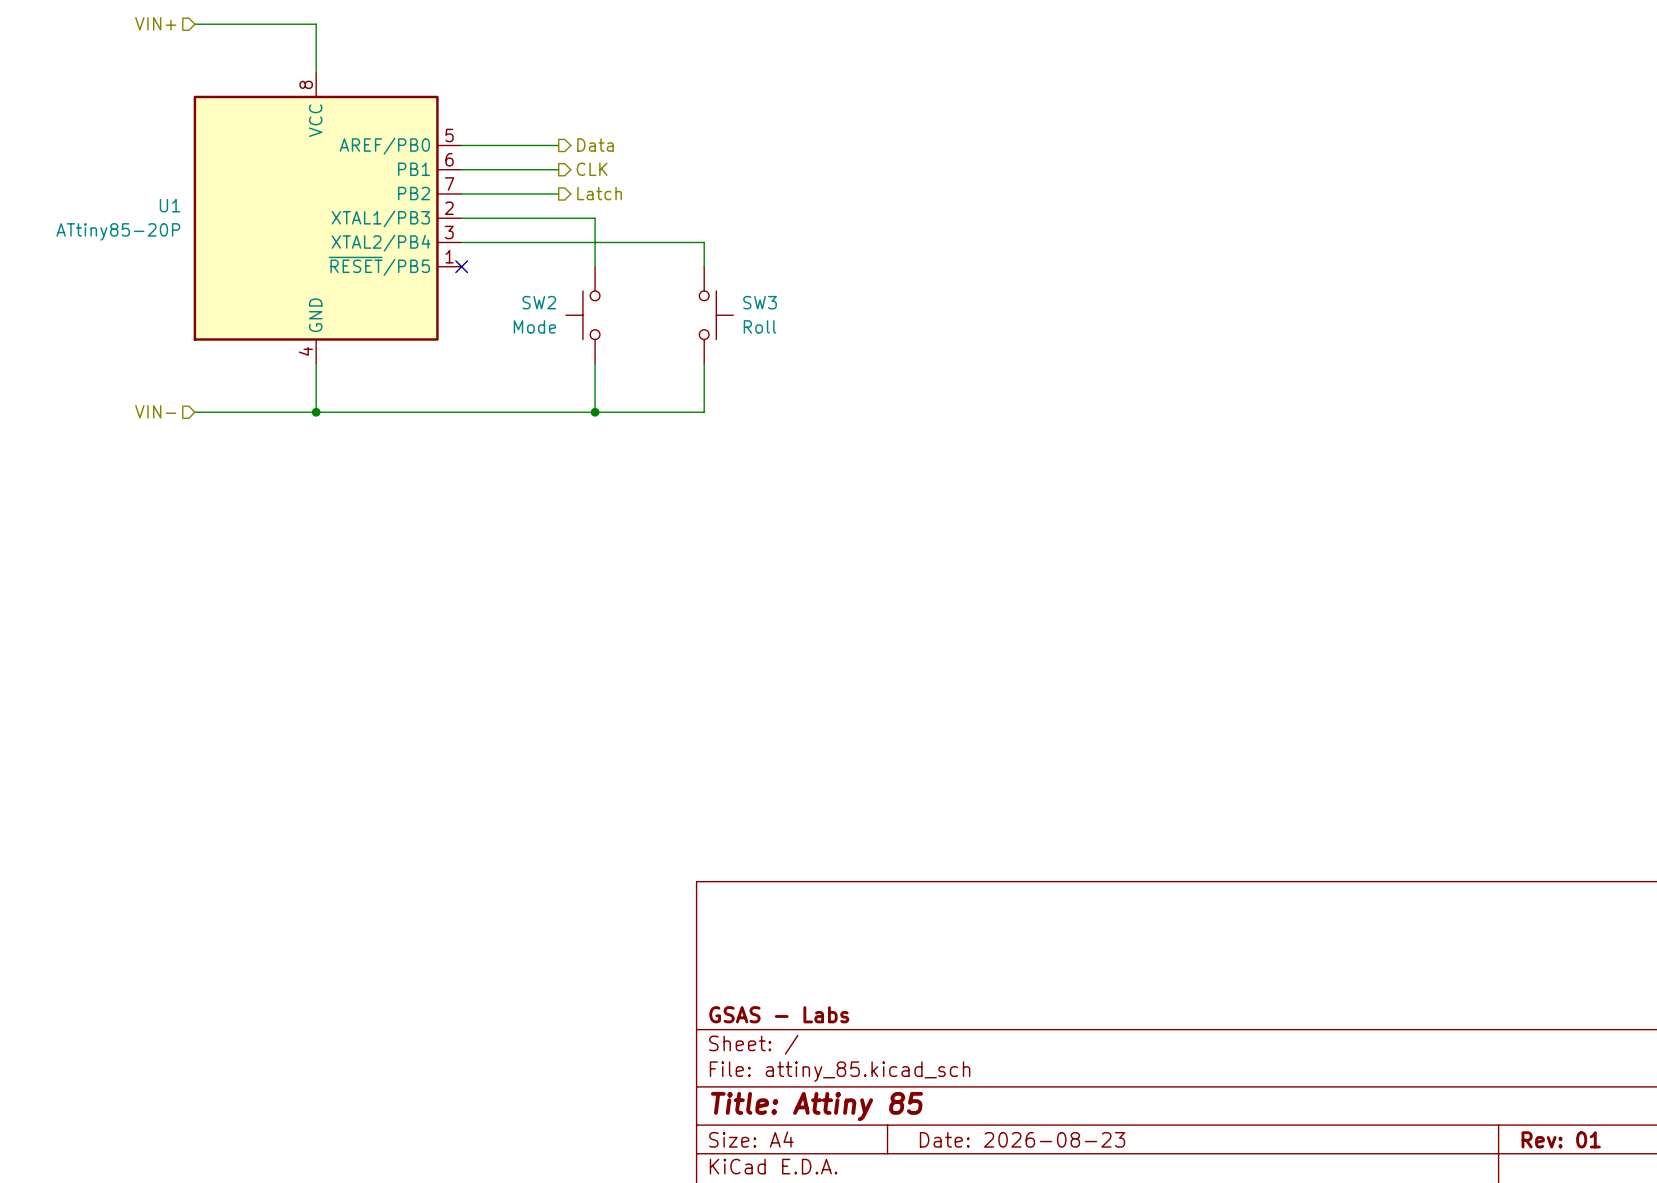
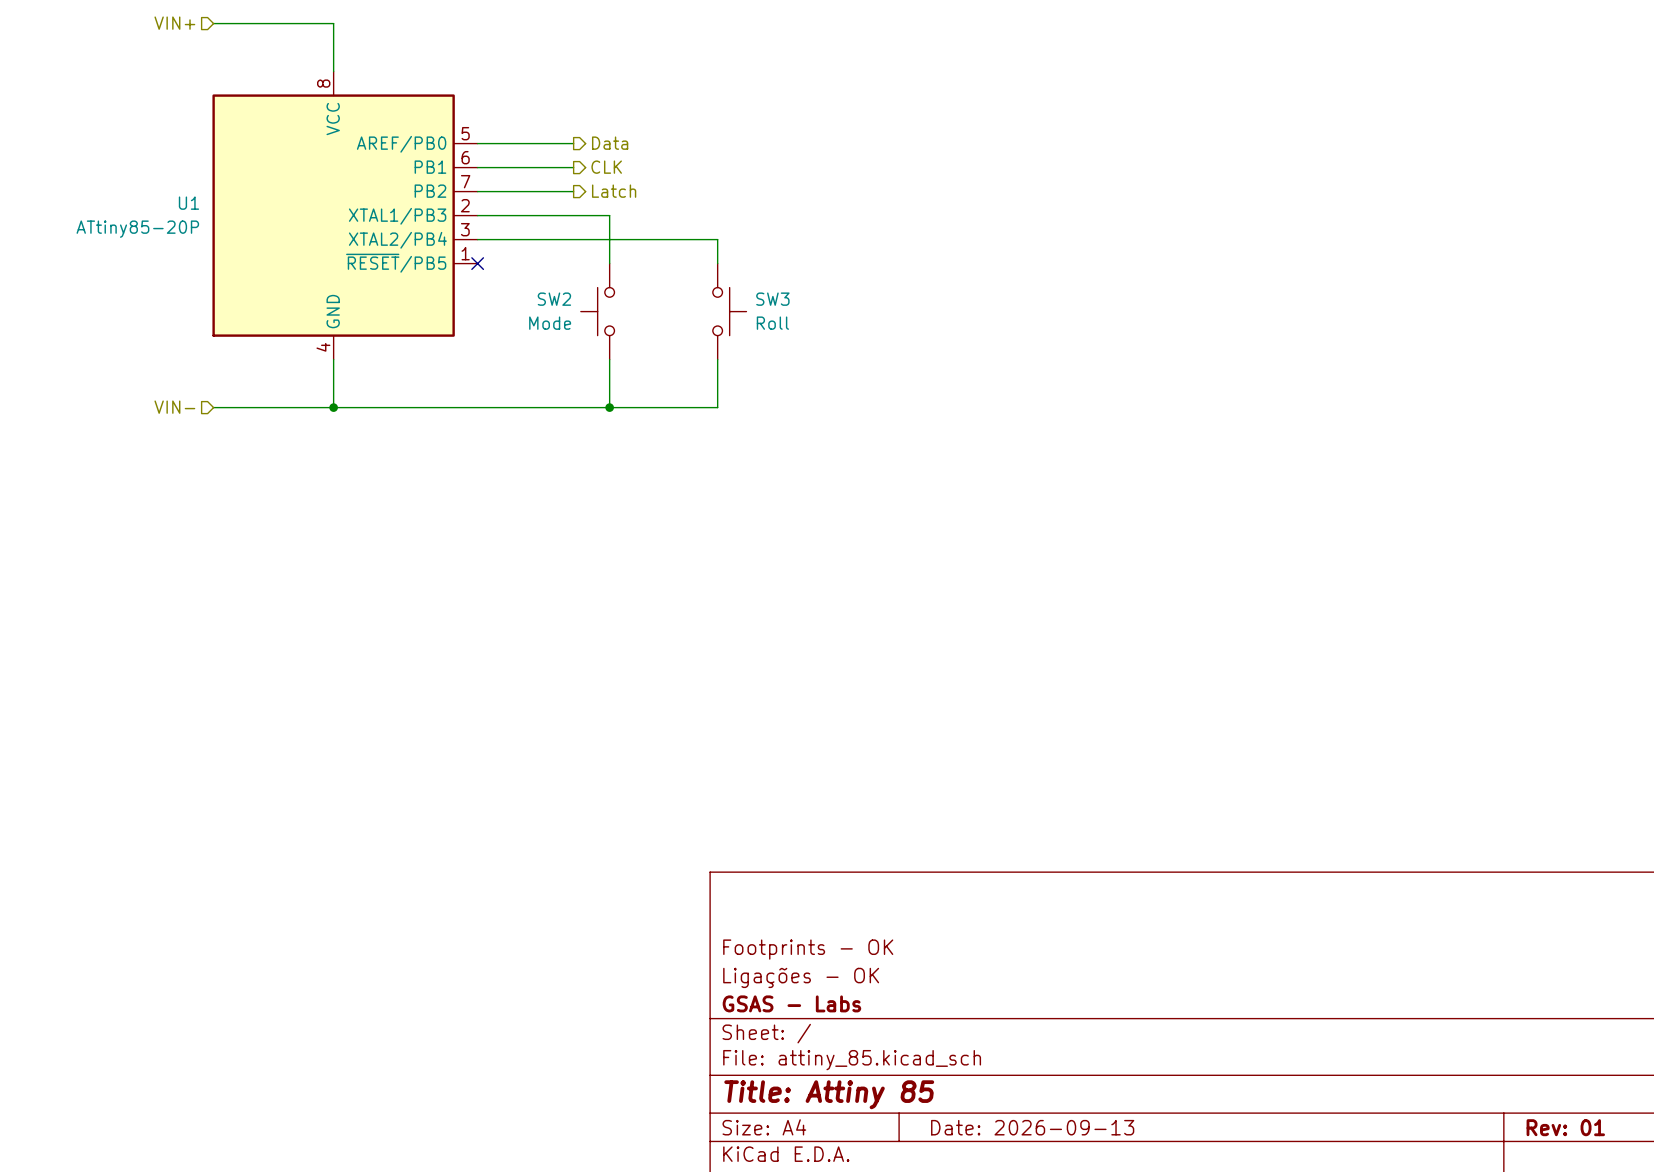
title block: none -> Footprints - OK (808, 949)
title block: none -> Ligações - OK (801, 977)
title block: Date: 2026-08-23 (1022, 1139) -> Date: 2026-09-13 (1032, 1127)

